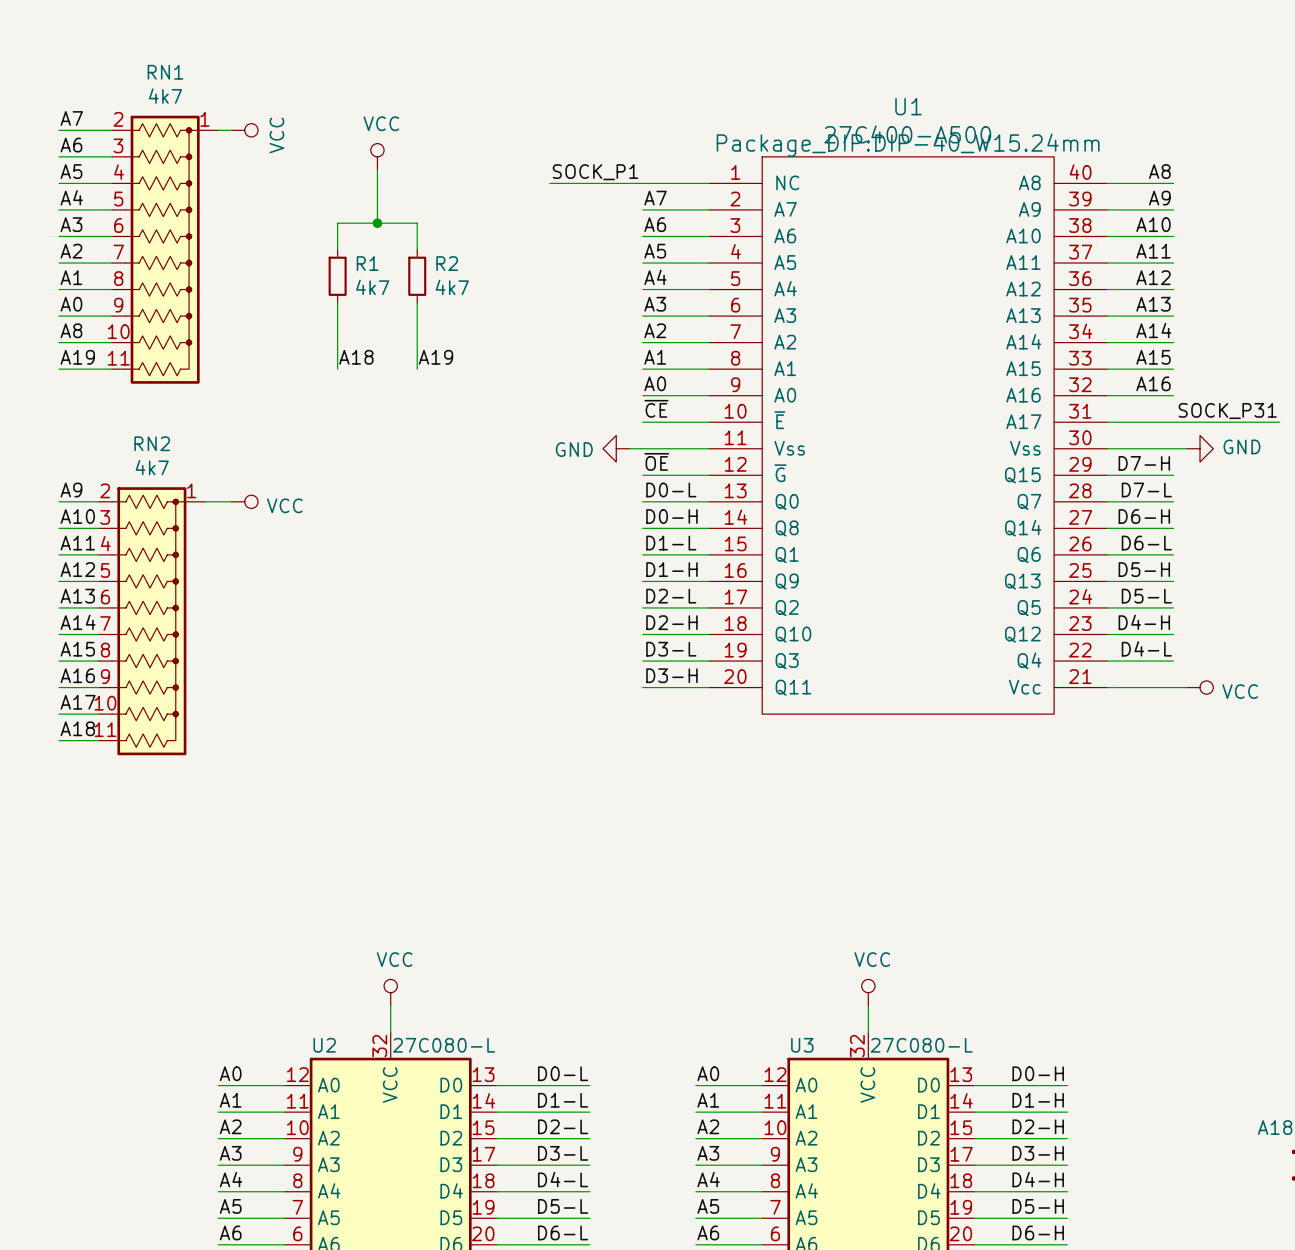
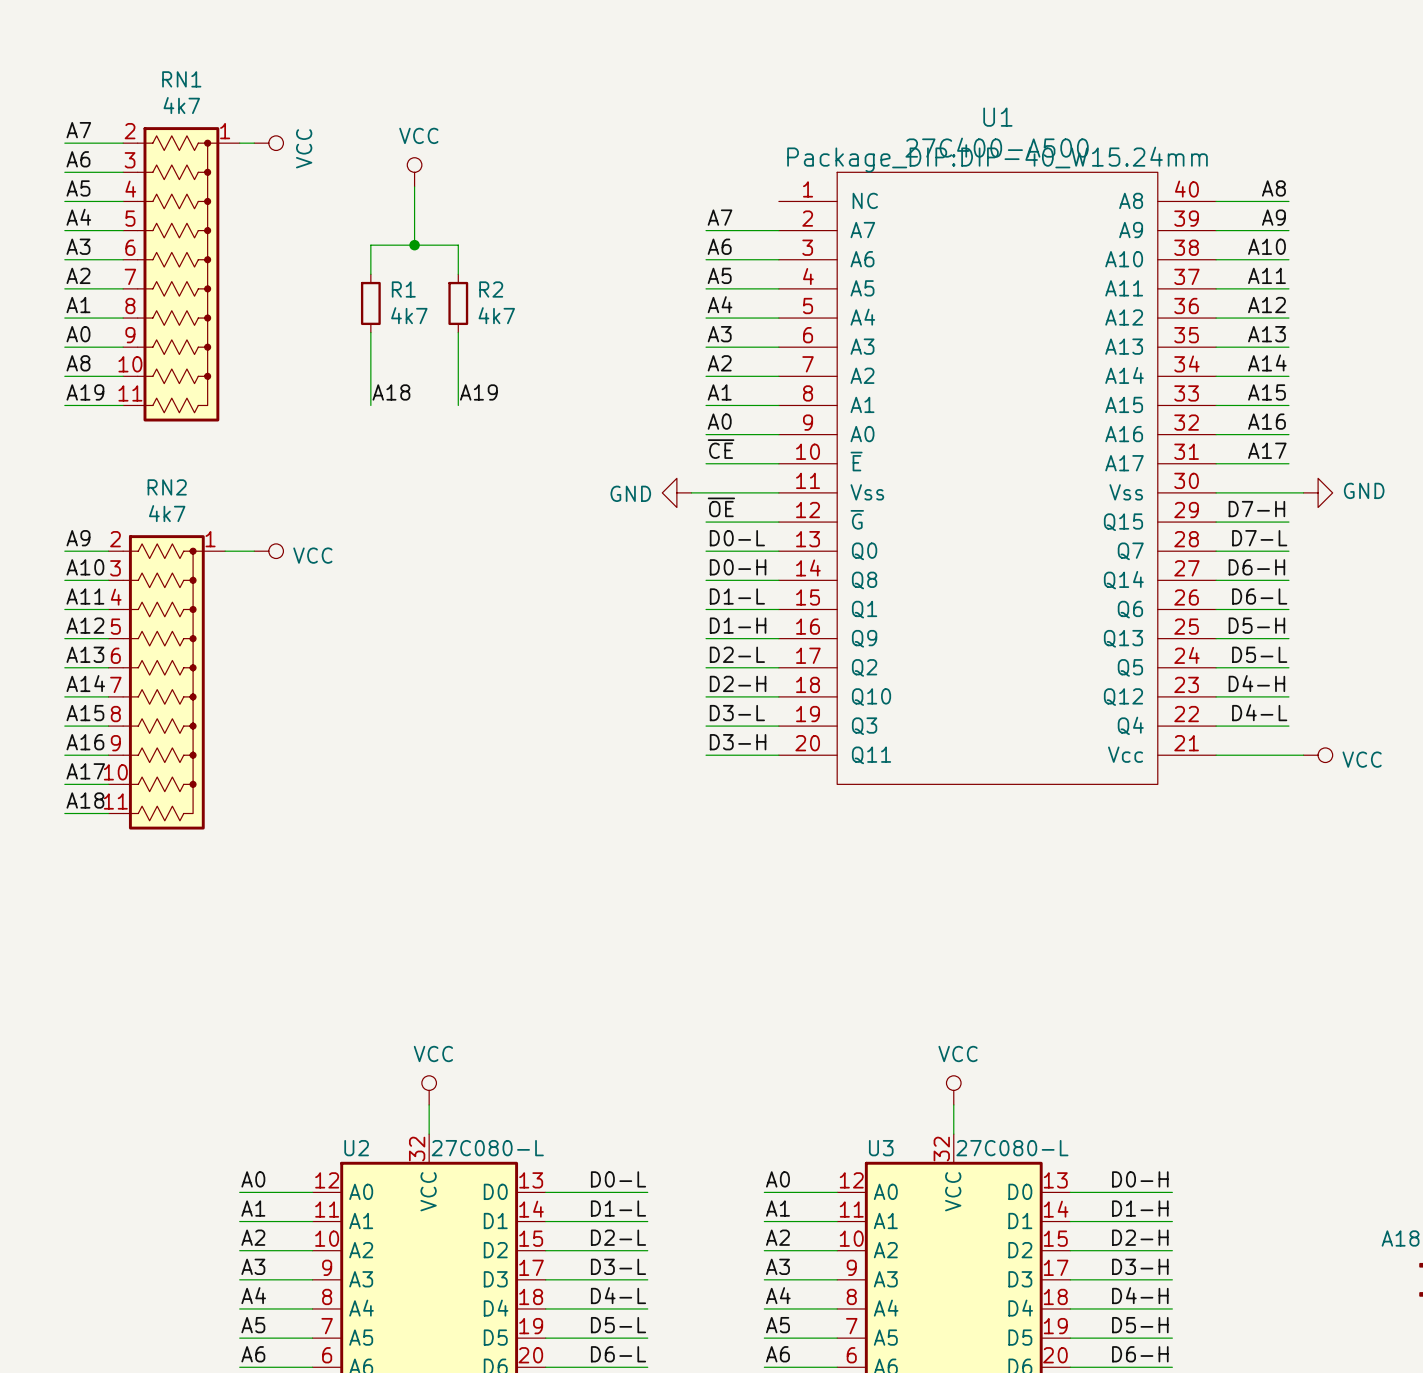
label: SOCK_P1 (595, 172) -> none
wire: (549, 183) (709, 183) -> none
label: none -> A17 (1267, 450)
label: SOCK_P31 (1227, 411) -> none
wire: (1173, 422) (1279, 422) -> none

